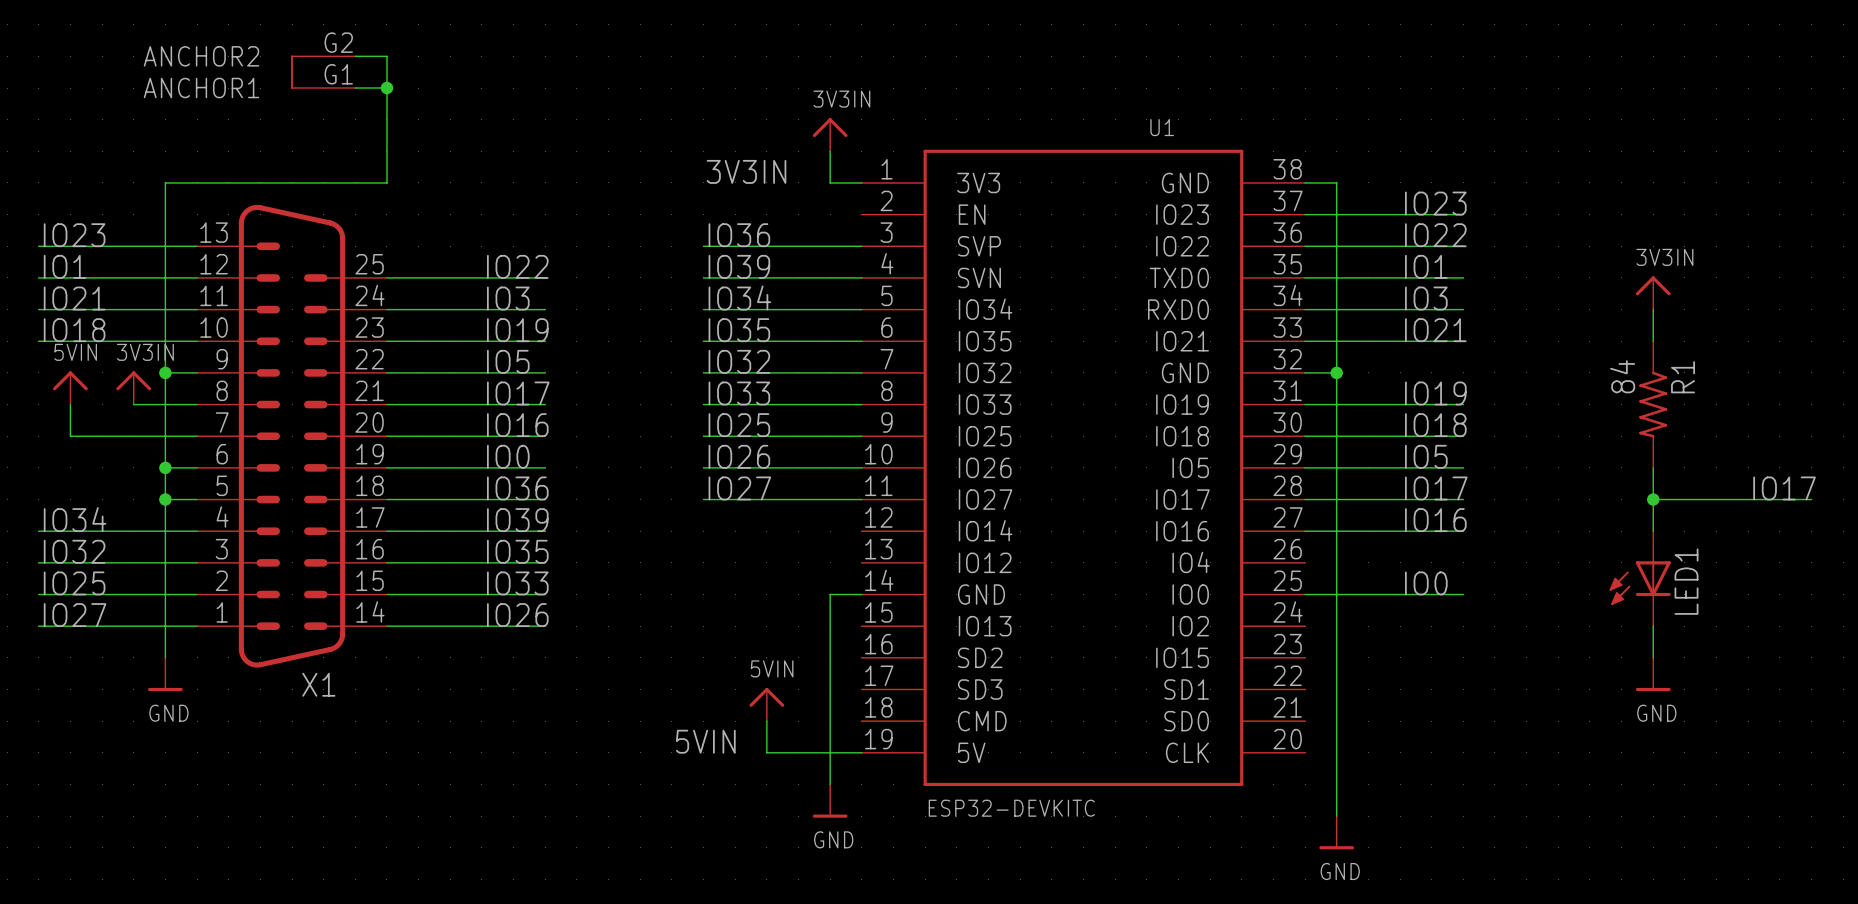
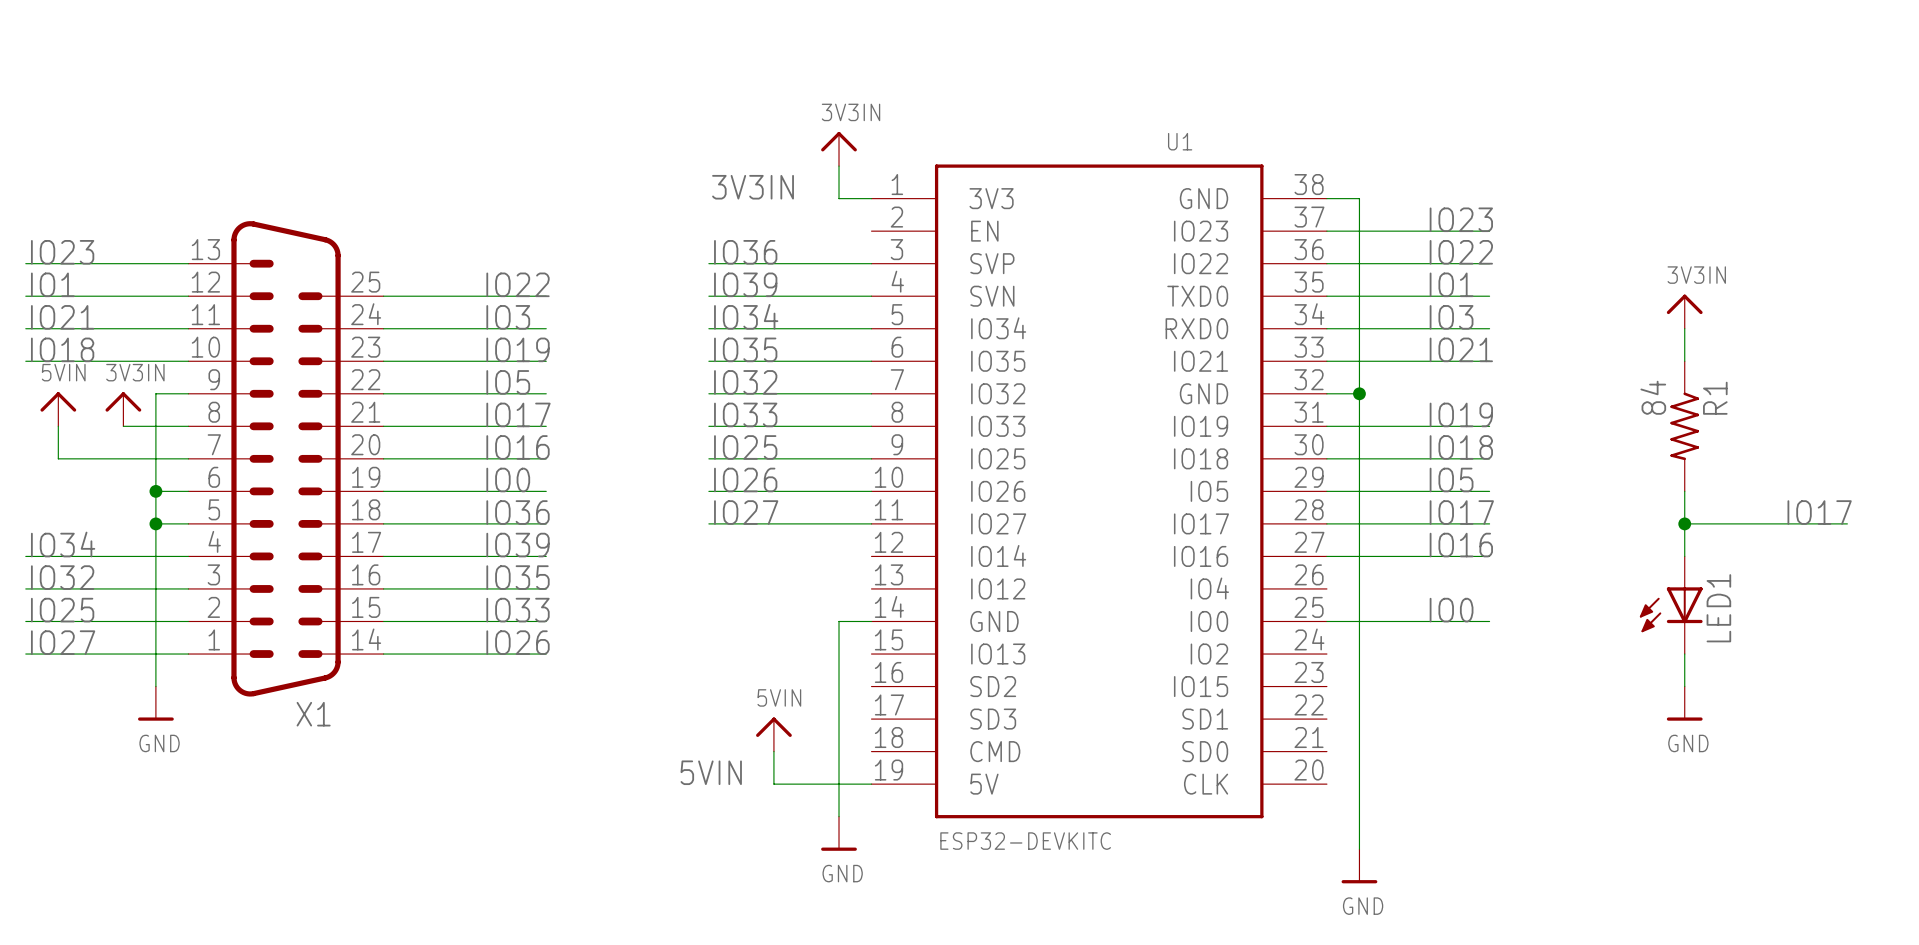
X1 symbol: [197, 55, 387, 668] -> [188, 221, 384, 697]
wire: (355, 56) (386, 56) (386, 182) (165, 182) (165, 372) -> none
wire: (355, 88) (386, 88) -> none
junction: (386, 88) -> none
junction: (165, 372) -> none

